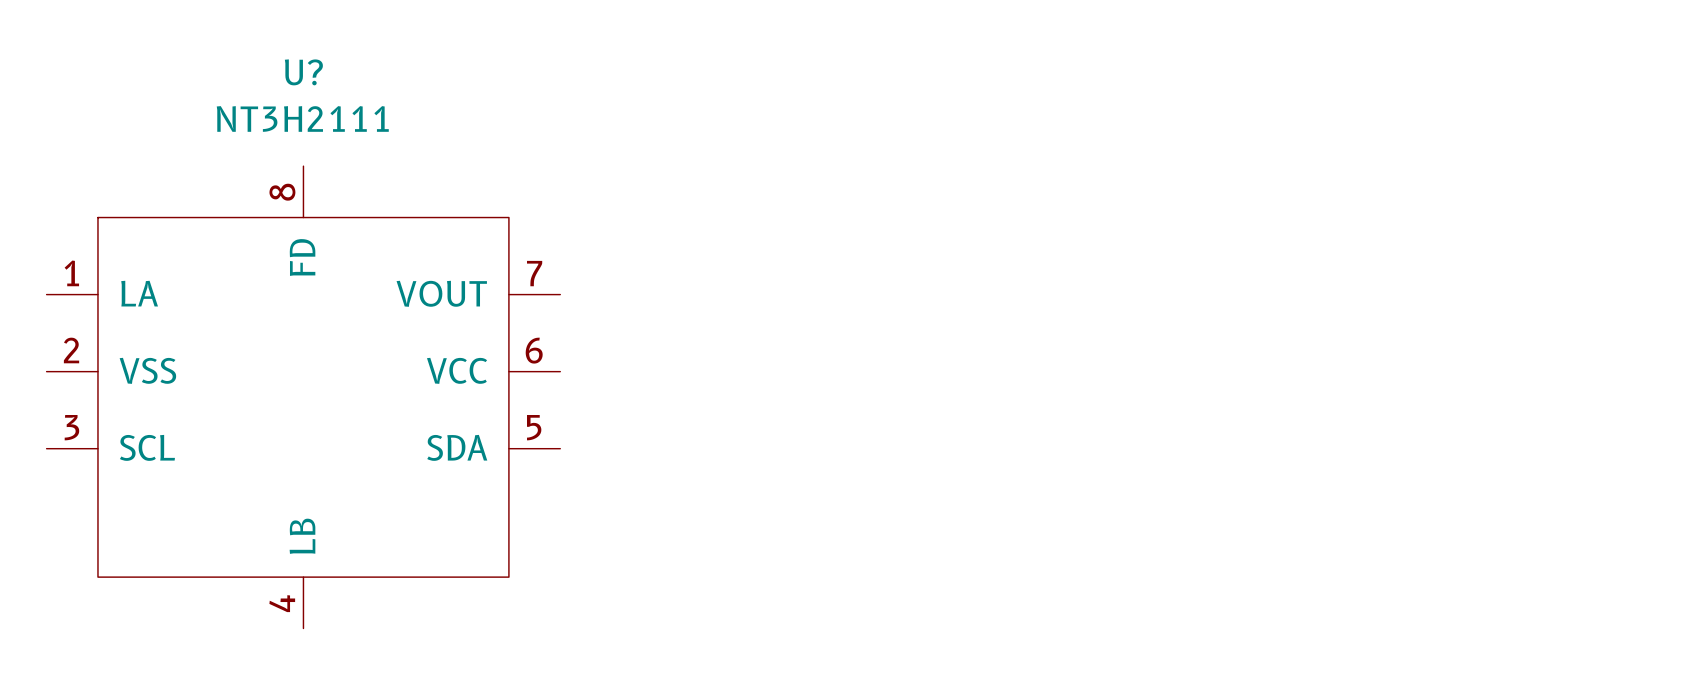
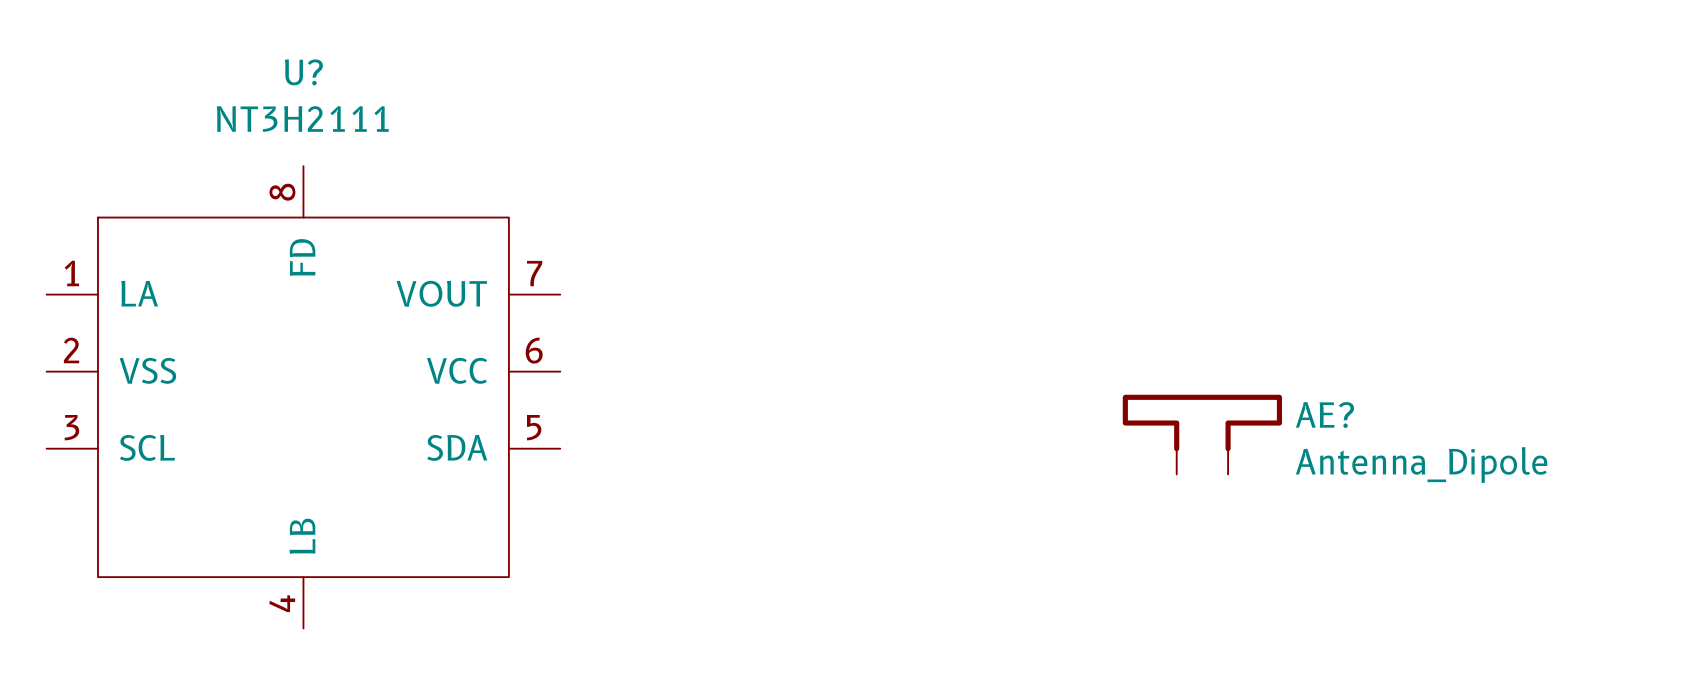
AE?: none -> Antenna_Dipole (1202, 434)

